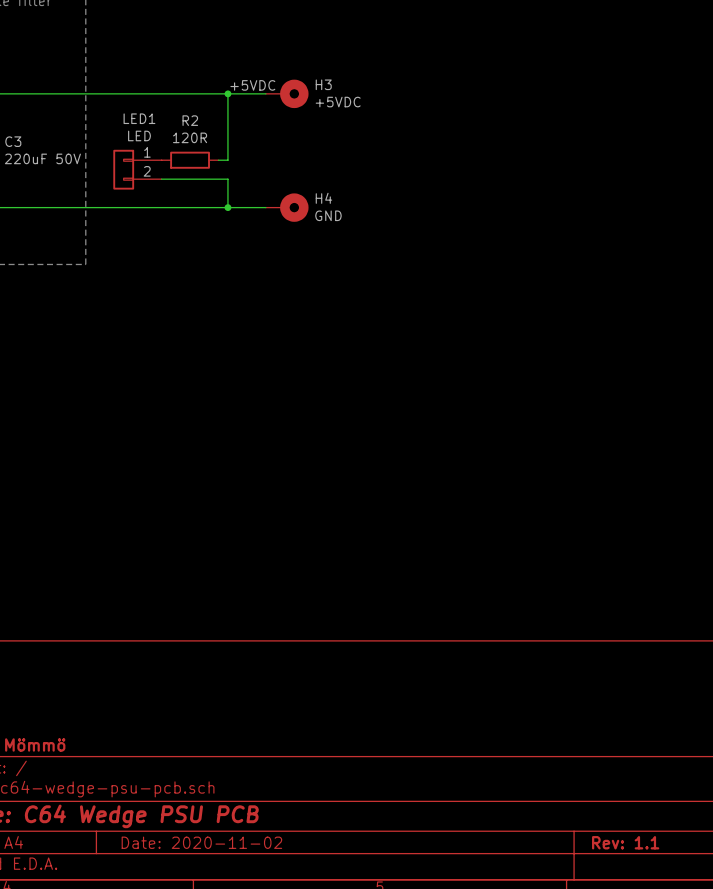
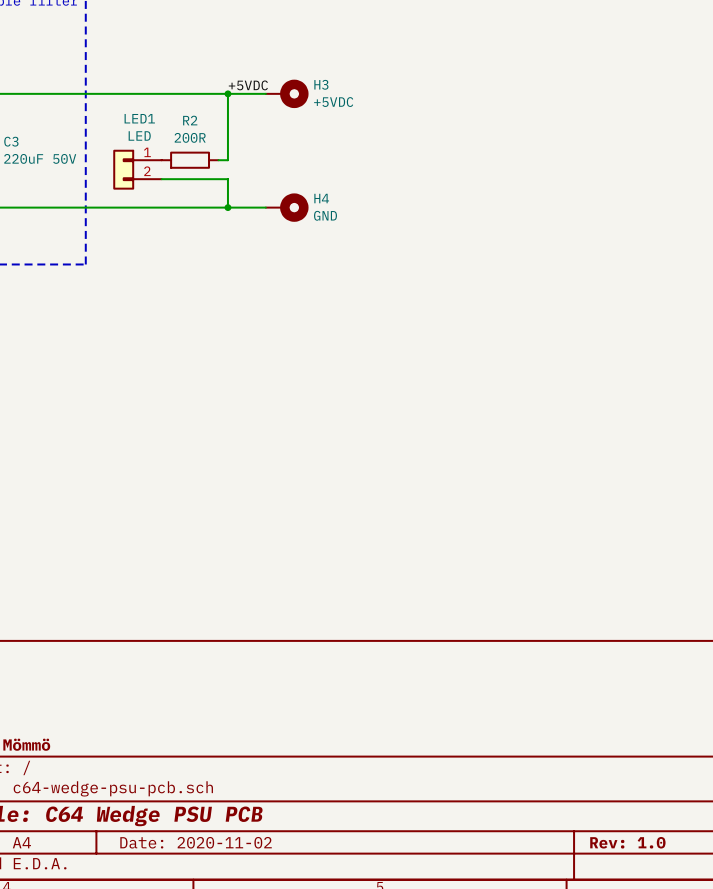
R2 value: 120R (190, 137) -> 200R (190, 137)
title block: Rev: 1.1 (625, 842) -> Rev: 1.0 (627, 842)

